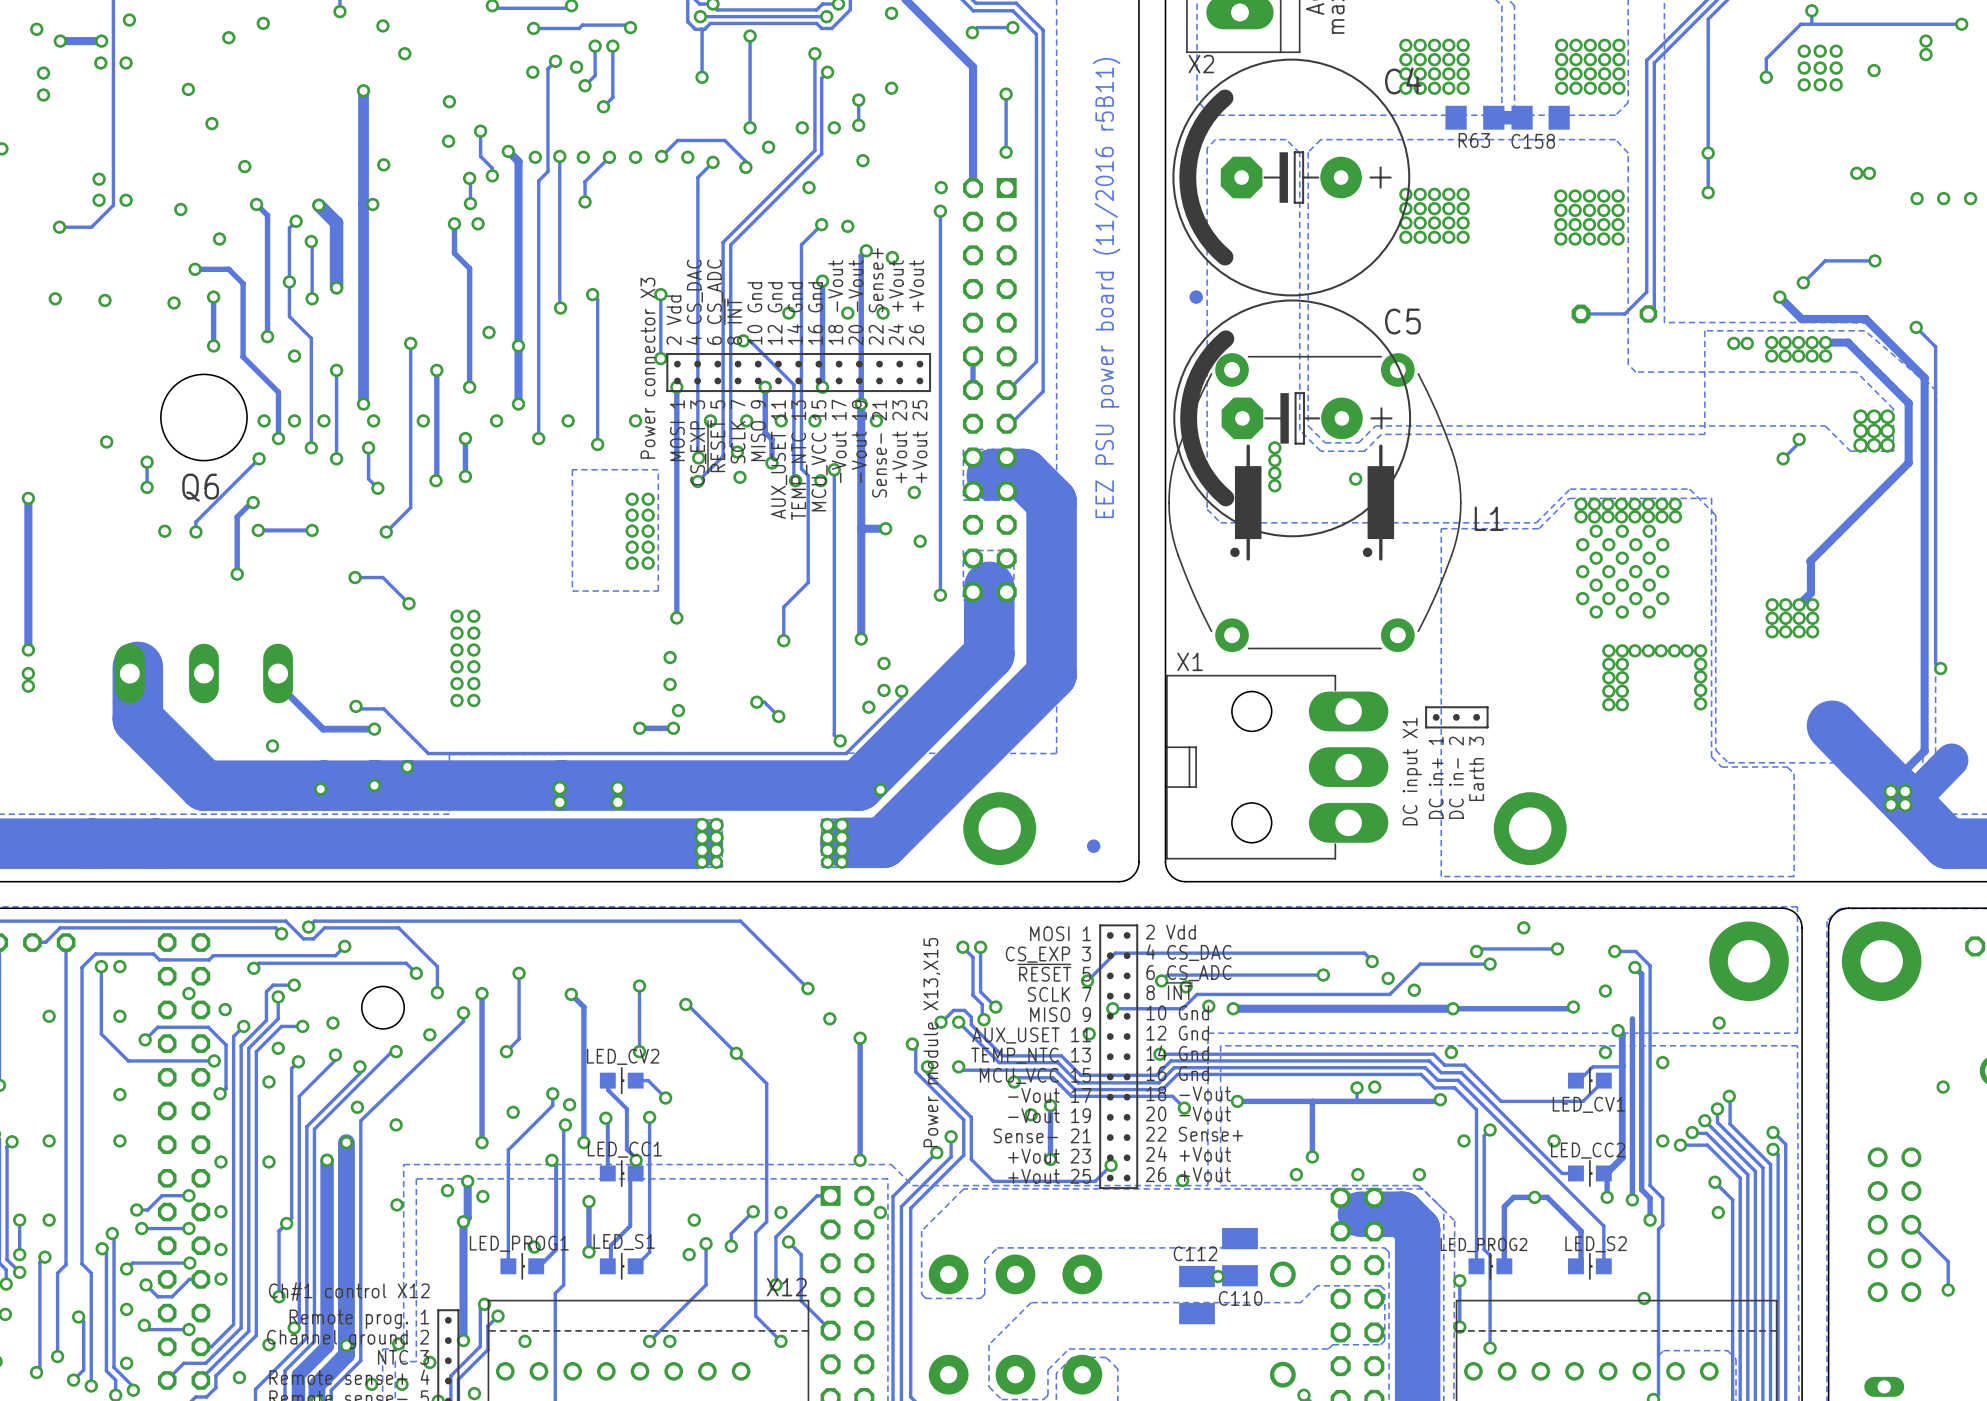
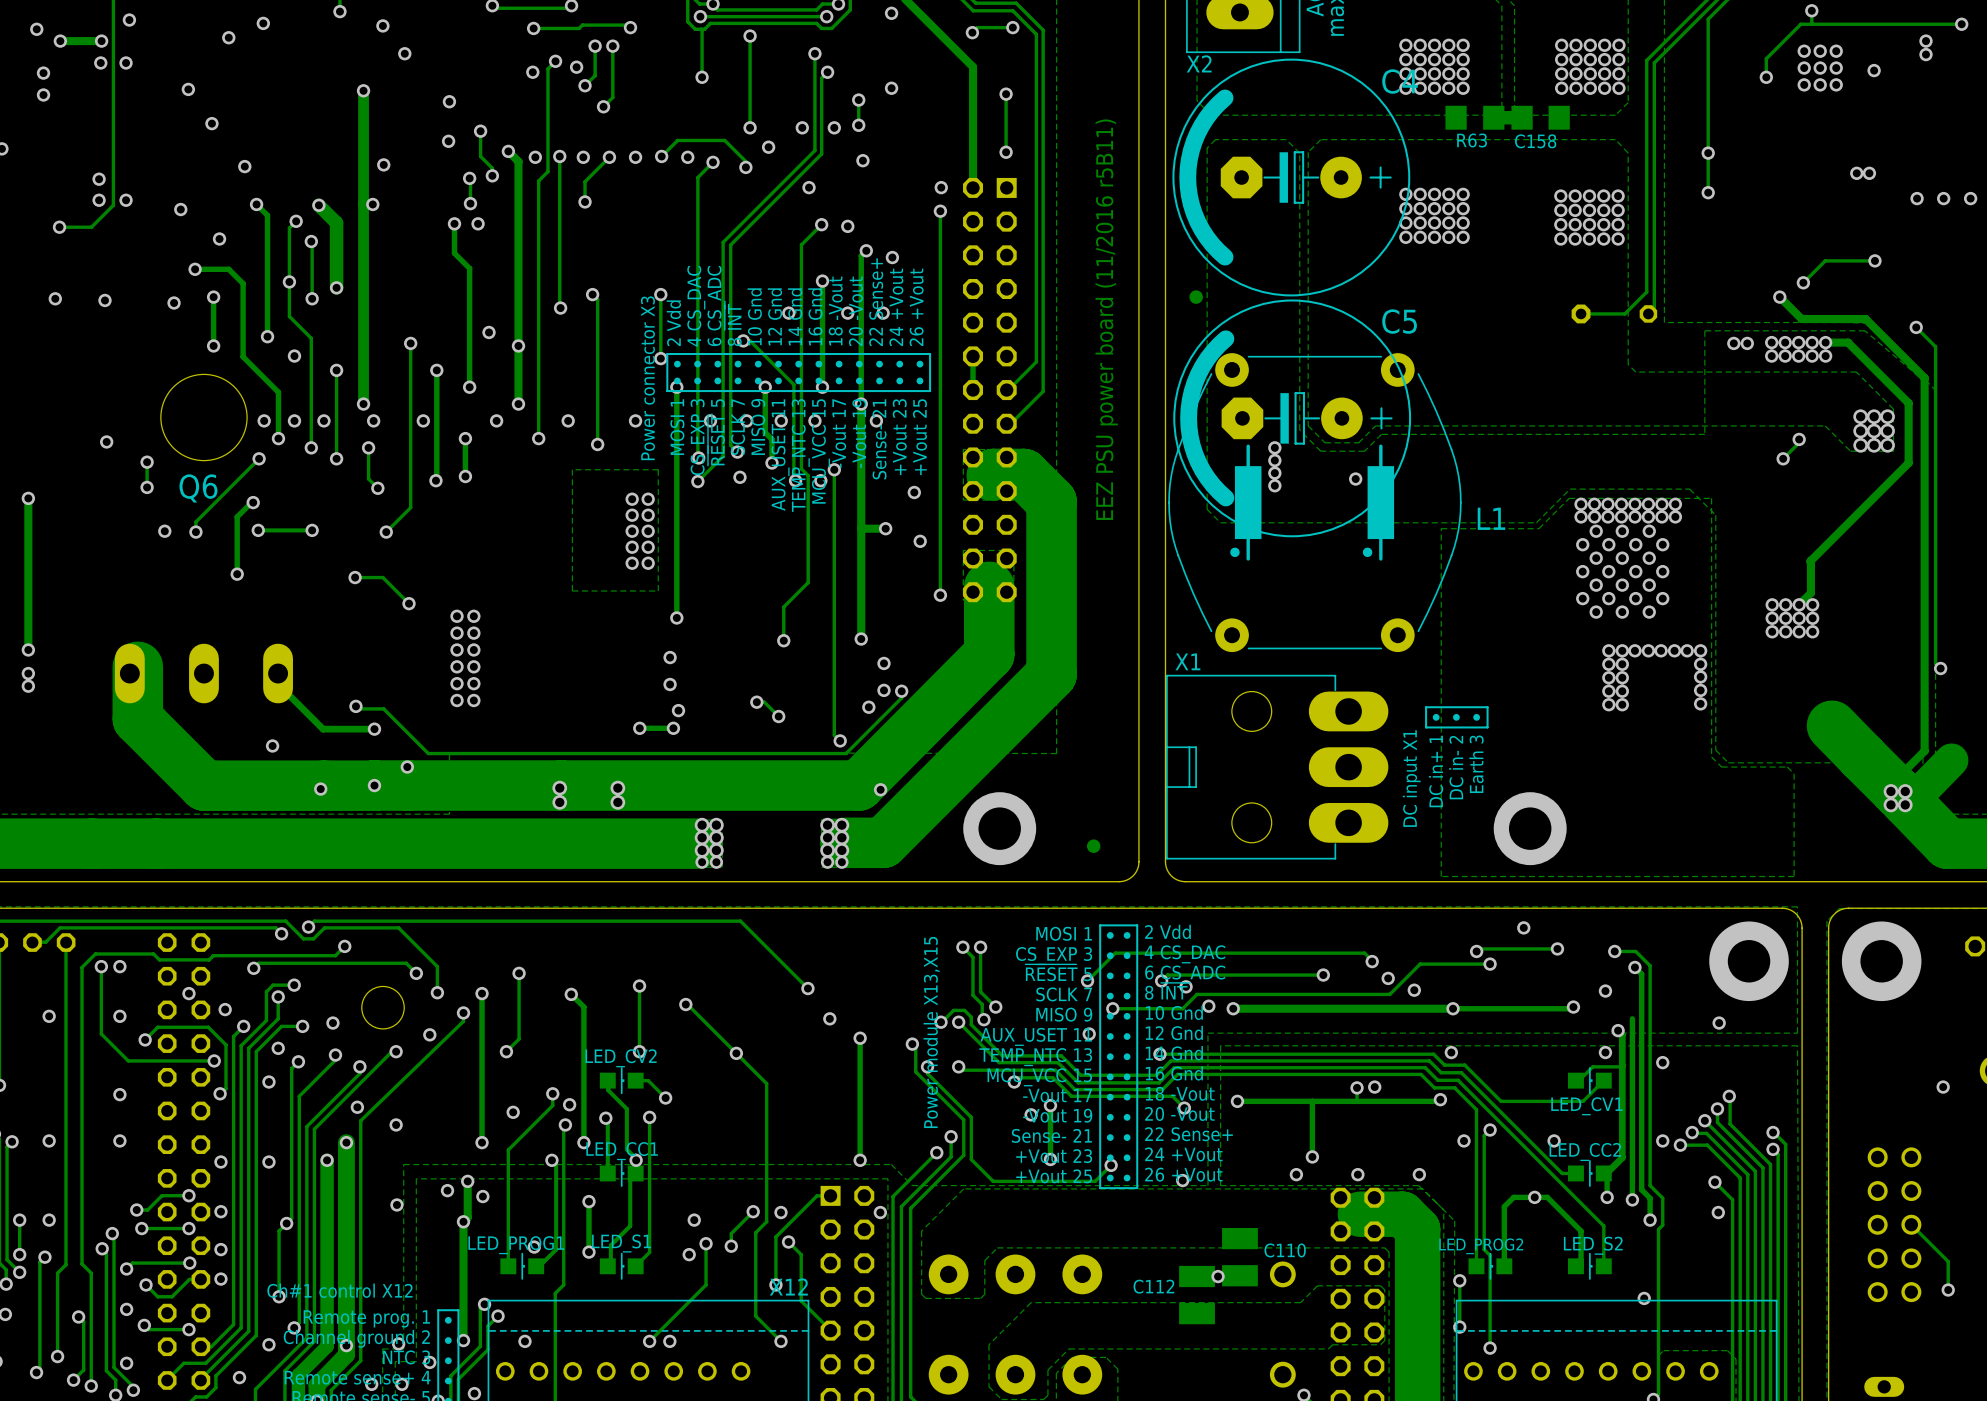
C112 name position: C112 (1195, 1253) -> C112 (1153, 1286)
C110 name position: C110 (1240, 1298) -> C110 (1285, 1250)

